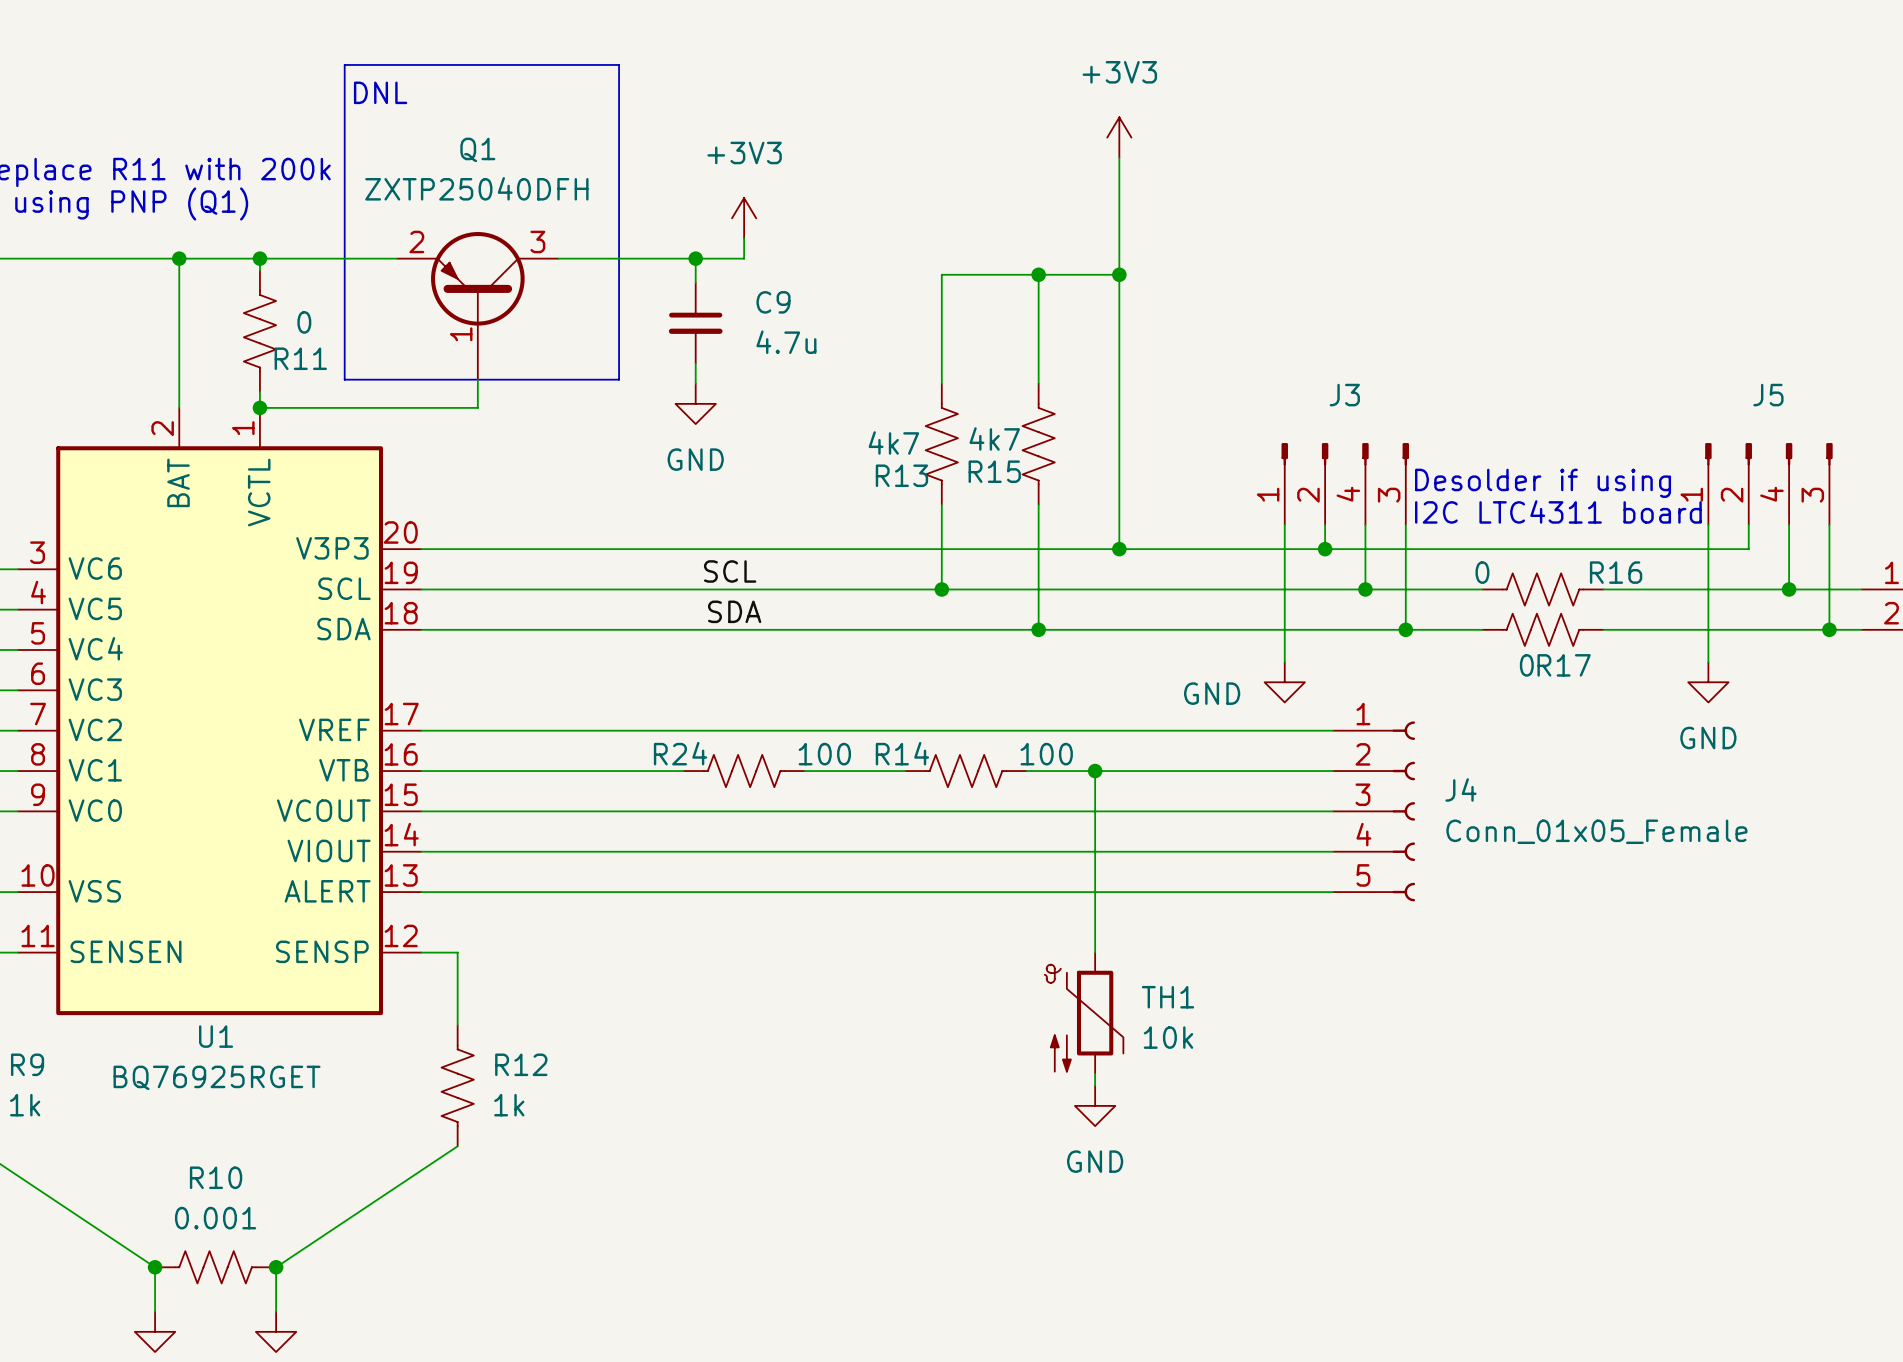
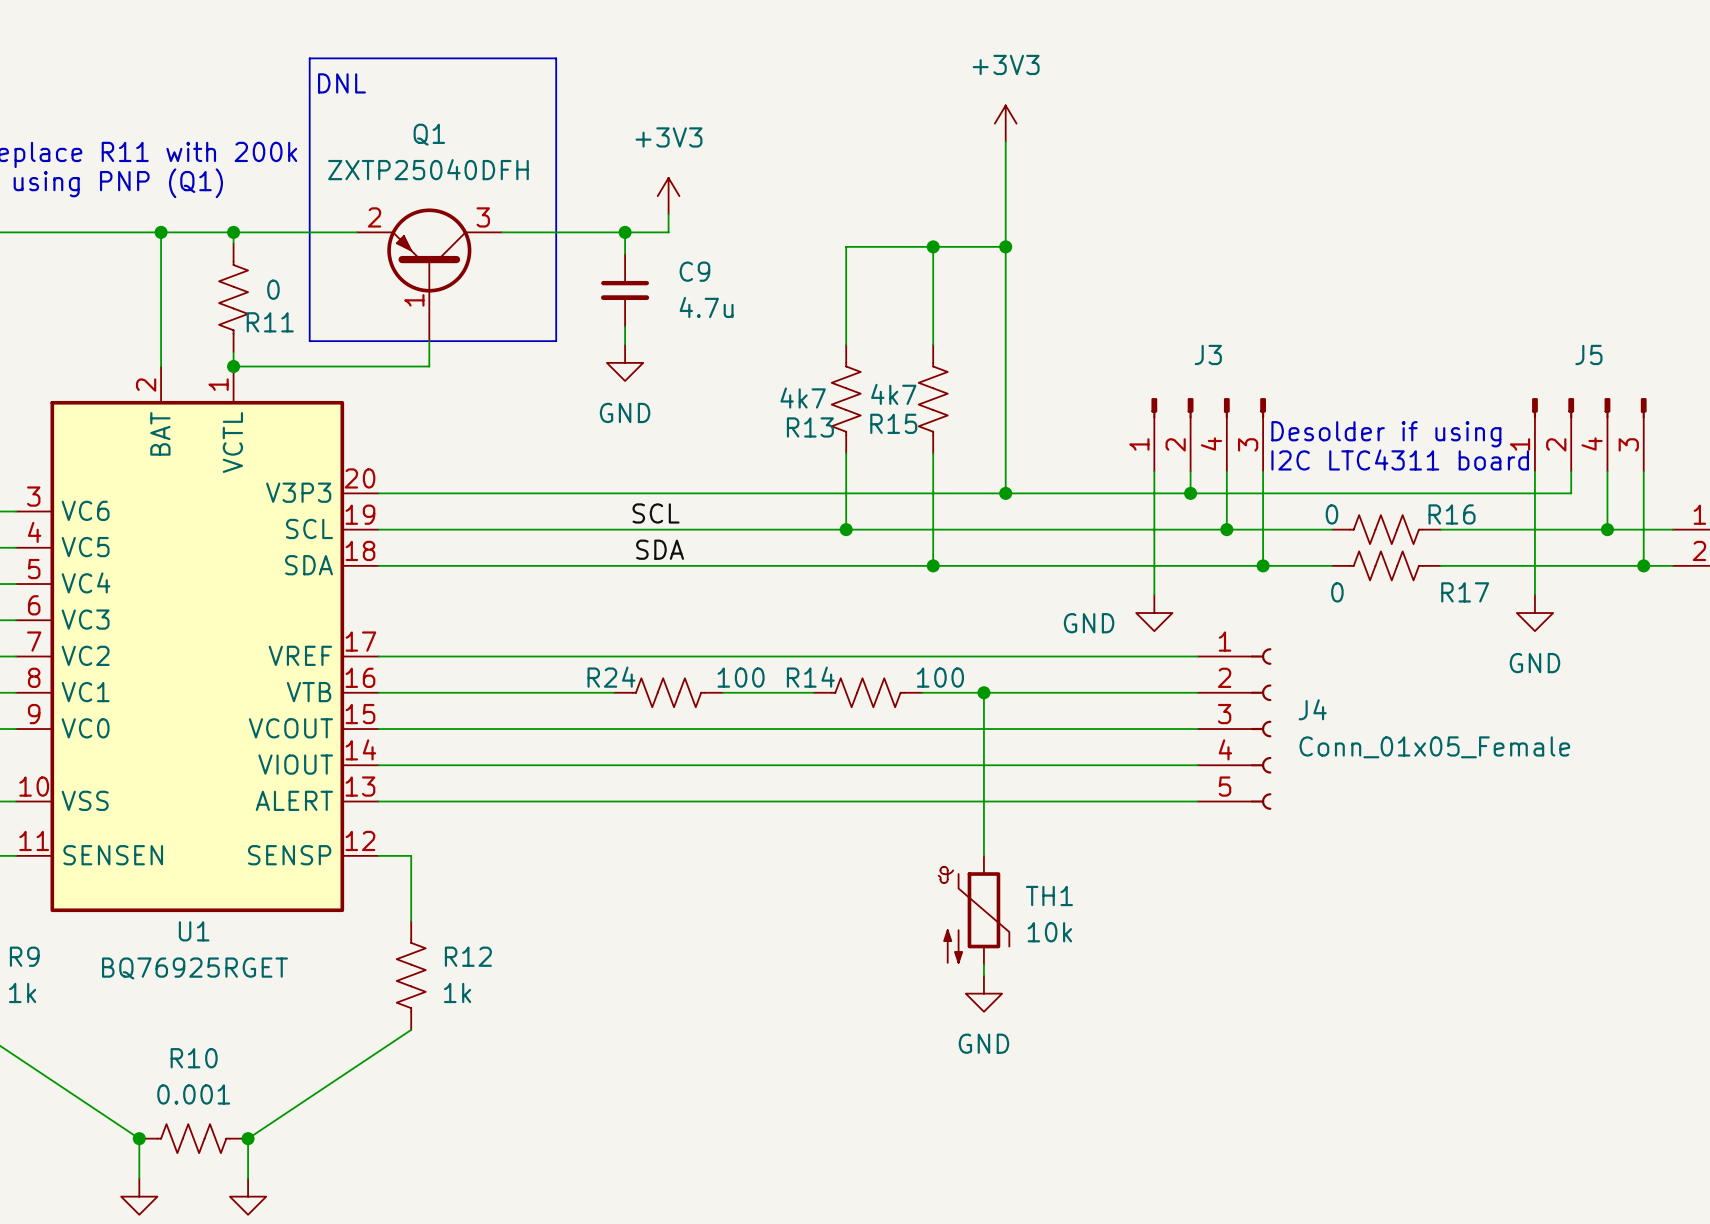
R17 value position: 0 (1526, 665) -> 0 (1337, 592)
R17 name position: R17 (1564, 665) -> R17 (1465, 592)

